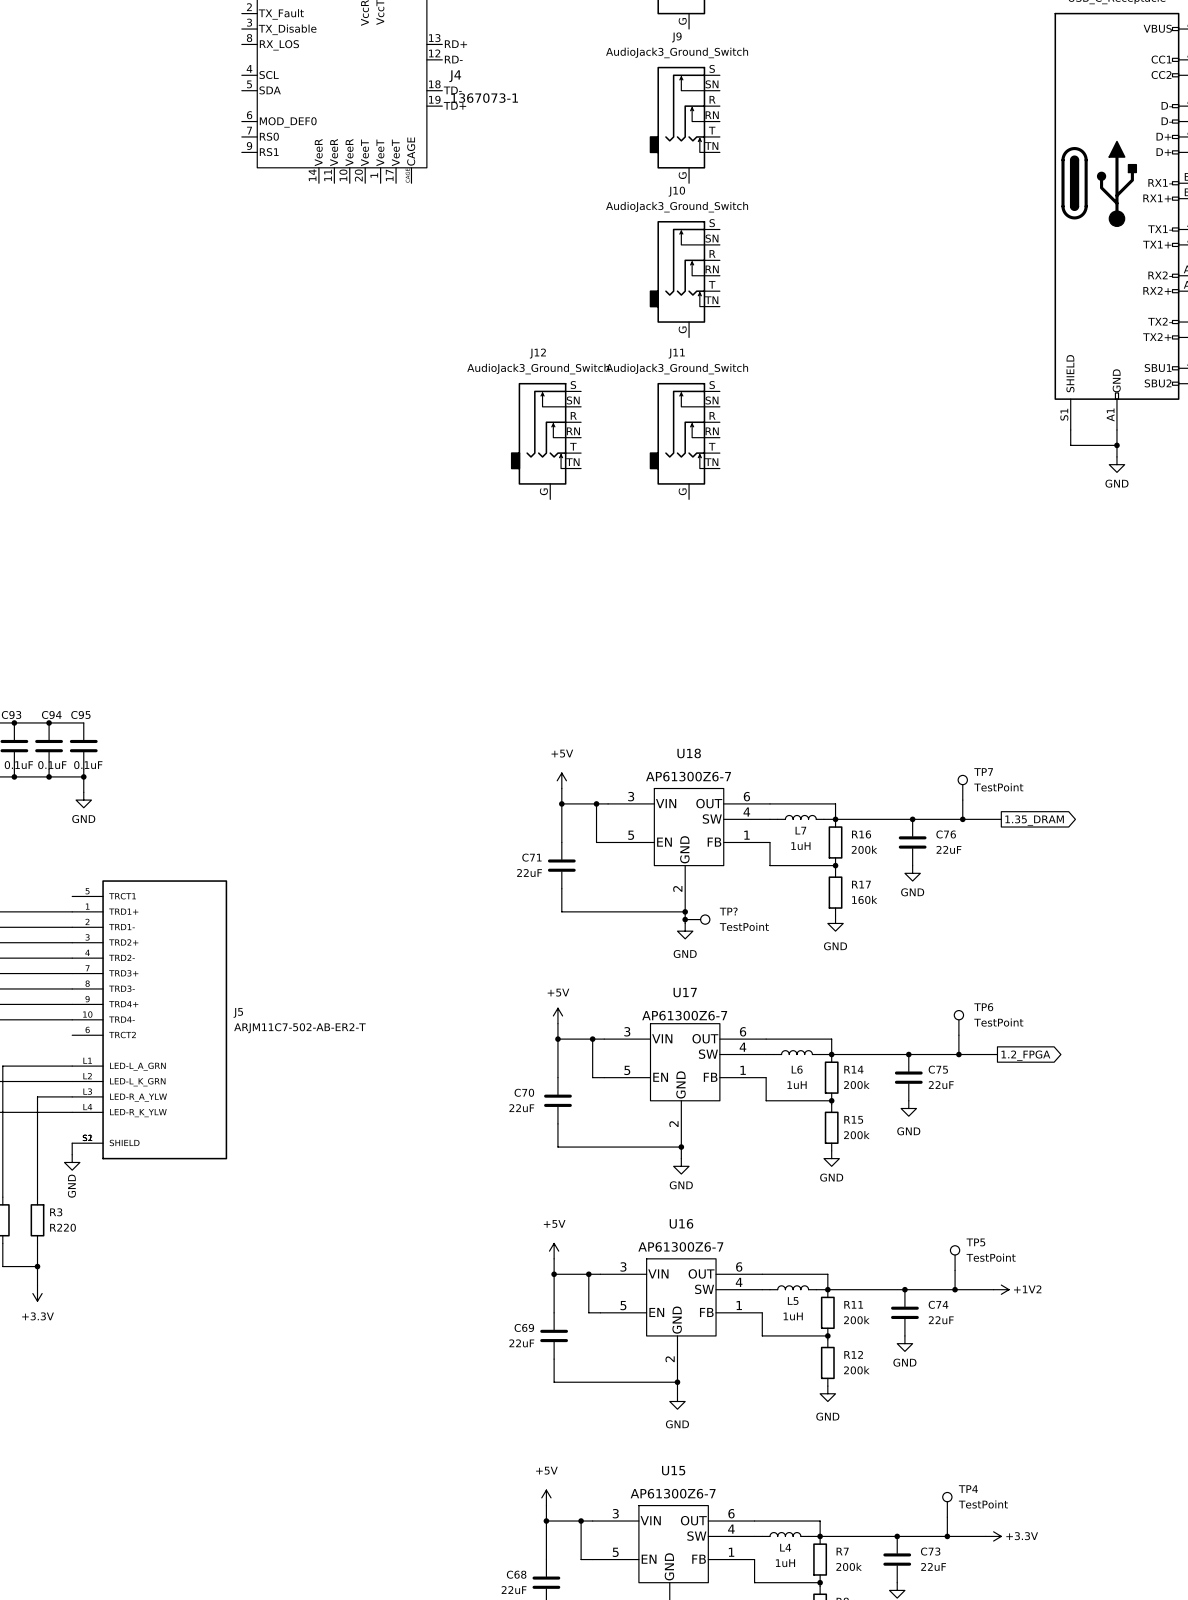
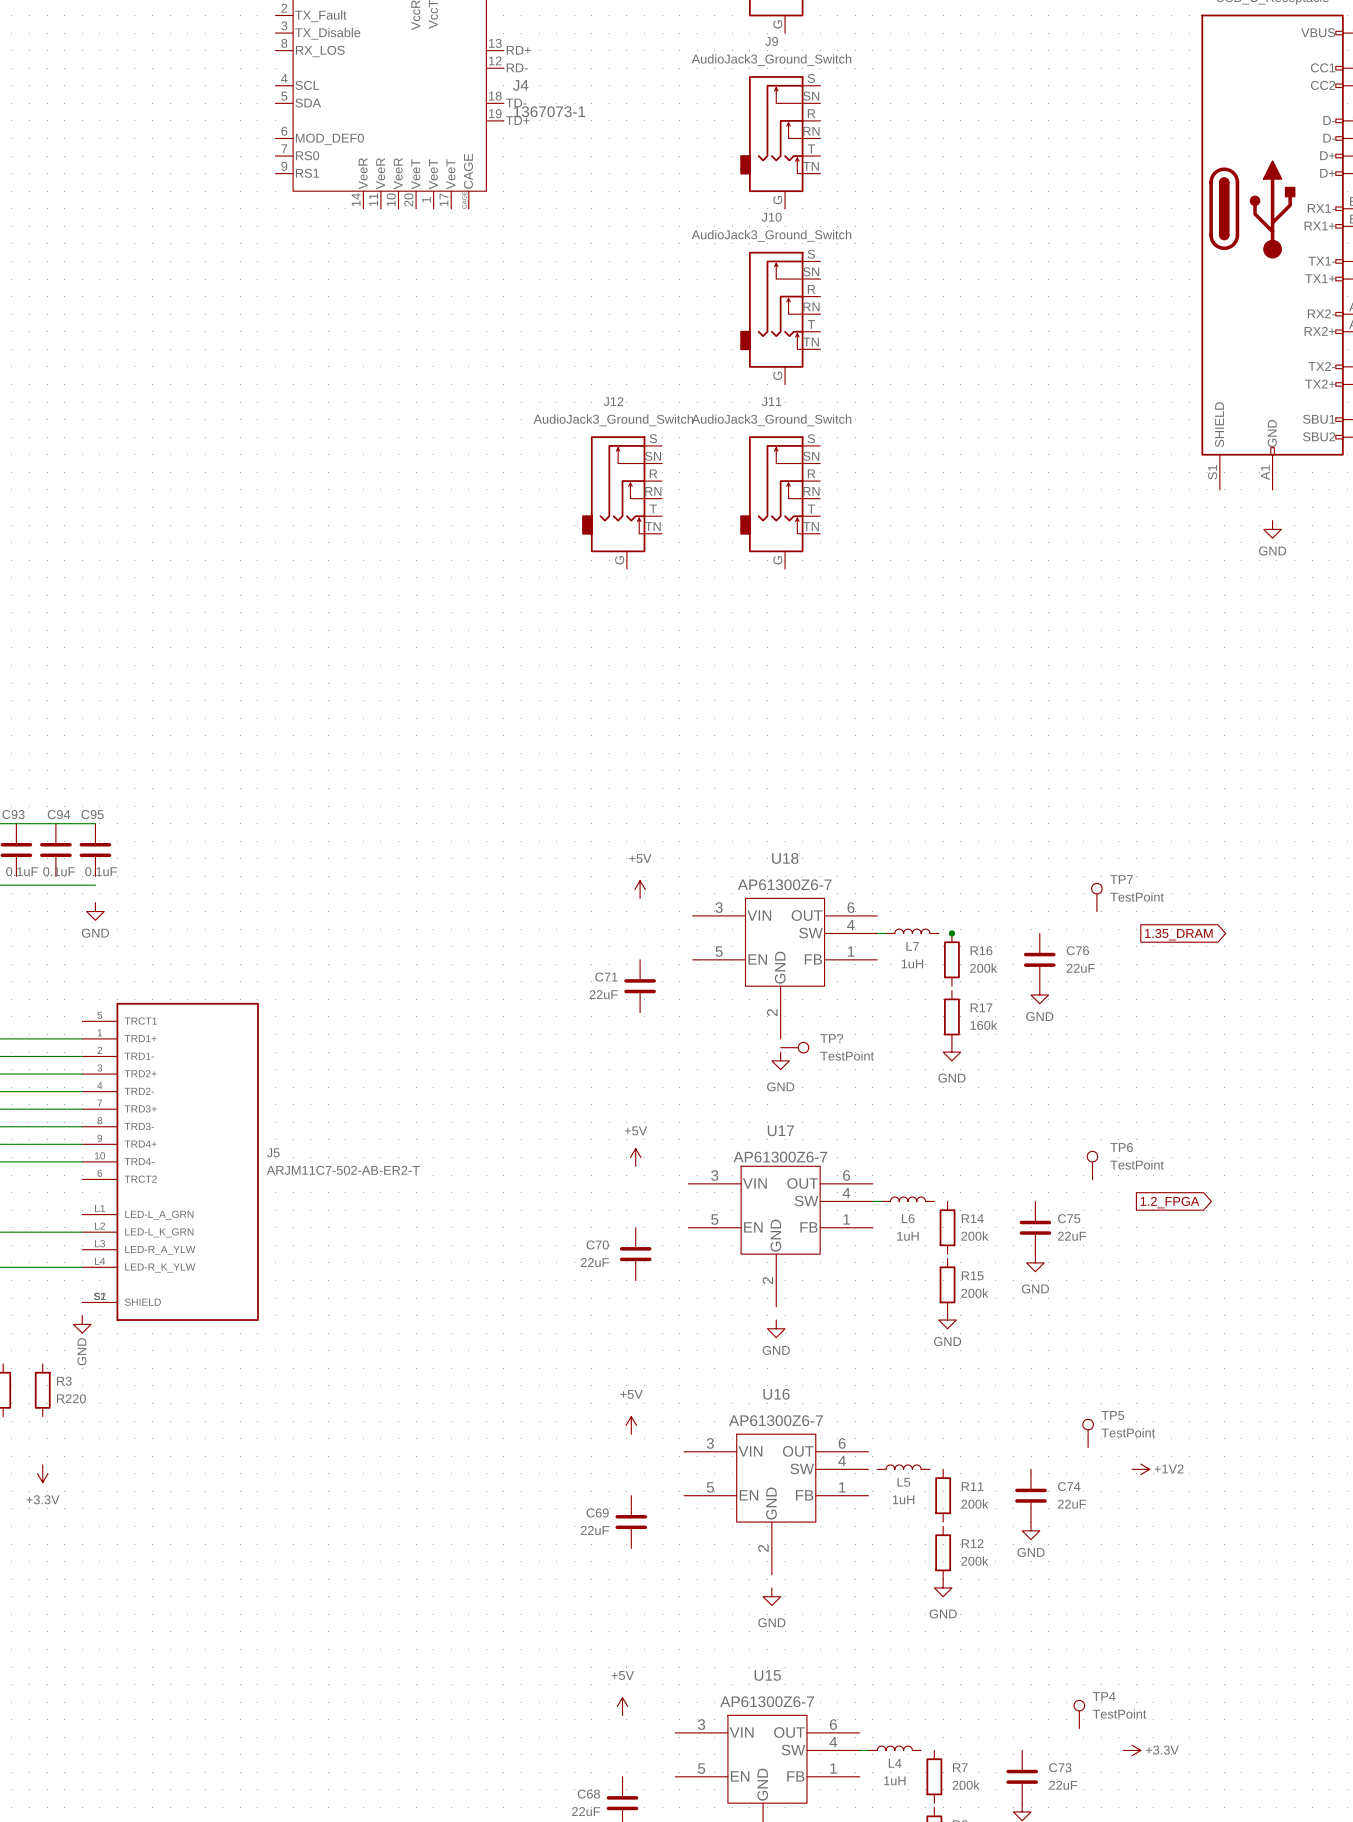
wire: (1070, 429) (1070, 445) (1116, 445) -> none
wire: (1116, 429) (1116, 456) -> none
junction: (1116, 445) -> none
junction: (14, 722) -> none
junction: (49, 722) -> none
wire: (14, 769) (14, 776) -> none
wire: (49, 769) (49, 776) -> none
wire: (83, 769) (83, 792) -> none
junction: (14, 776) -> none
junction: (49, 776) -> none
junction: (83, 776) -> none
wire: (561, 788) (561, 842) -> none
wire: (962, 800) (962, 819) -> none
wire: (561, 803) (608, 803) -> none
junction: (561, 803) -> none
wire: (596, 803) (596, 842) (608, 842) -> none
junction: (596, 803) -> none
wire: (770, 803) (835, 803) (835, 819) -> none
wire: (823, 819) (1001, 819) -> none
junction: (912, 819) -> none
junction: (962, 819) -> none
wire: (770, 842) (770, 865) (835, 865) (835, 869) -> none
junction: (835, 865) -> none
wire: (561, 888) (561, 911) (685, 911) (685, 923) -> none
junction: (685, 911) -> none
junction: (685, 919) -> none
wire: (557, 1023) (557, 1077) -> none
wire: (958, 1035) (958, 1054) -> none
wire: (557, 1039) (604, 1039) -> none
junction: (557, 1039) -> none
wire: (592, 1039) (592, 1077) (604, 1077) -> none
junction: (592, 1039) -> none
wire: (766, 1039) (831, 1039) (831, 1054) -> none
wire: (820, 1054) (997, 1054) -> none
junction: (831, 1054) -> none
junction: (908, 1054) -> none
junction: (958, 1054) -> none
wire: (72, 1066) (2, 1066) (2, 1197) -> none
wire: (766, 1077) (766, 1100) (831, 1100) (831, 1104) -> none
wire: (72, 1096) (37, 1096) (37, 1197) -> none
junction: (831, 1100) -> none
wire: (557, 1123) (557, 1147) (681, 1147) (681, 1158) -> none
wire: (72, 1143) (72, 1154) -> none
junction: (681, 1147) -> none
wire: (2, 1243) (2, 1266) (37, 1266) -> none
wire: (37, 1243) (37, 1285) -> none
wire: (554, 1258) (554, 1312) -> none
junction: (37, 1266) -> none
wire: (955, 1270) (955, 1289) -> none
wire: (554, 1274) (600, 1274) -> none
junction: (554, 1274) -> none
wire: (588, 1274) (588, 1312) (600, 1312) -> none
junction: (588, 1274) -> none
wire: (762, 1274) (827, 1274) (827, 1289) -> none
wire: (762, 1289) (770, 1289) -> none
wire: (816, 1289) (993, 1289) -> none
junction: (827, 1289) -> none
junction: (904, 1289) -> none
junction: (955, 1289) -> none
wire: (762, 1312) (762, 1335) (827, 1335) (827, 1339) -> none
junction: (827, 1335) -> none
wire: (554, 1359) (554, 1382) (677, 1382) (677, 1393) -> none
junction: (677, 1382) -> none
wire: (546, 1505) (546, 1559) -> none
wire: (947, 1517) (947, 1536) -> none
wire: (546, 1521) (592, 1521) -> none
junction: (546, 1521) -> none
wire: (581, 1521) (581, 1559) (592, 1559) -> none
junction: (581, 1521) -> none
wire: (754, 1521) (820, 1521) (820, 1536) -> none
wire: (808, 1536) (985, 1536) -> none
junction: (820, 1536) -> none
junction: (897, 1536) -> none
junction: (947, 1536) -> none
wire: (754, 1559) (754, 1582) (820, 1582) (820, 1586) -> none
junction: (820, 1582) -> none

